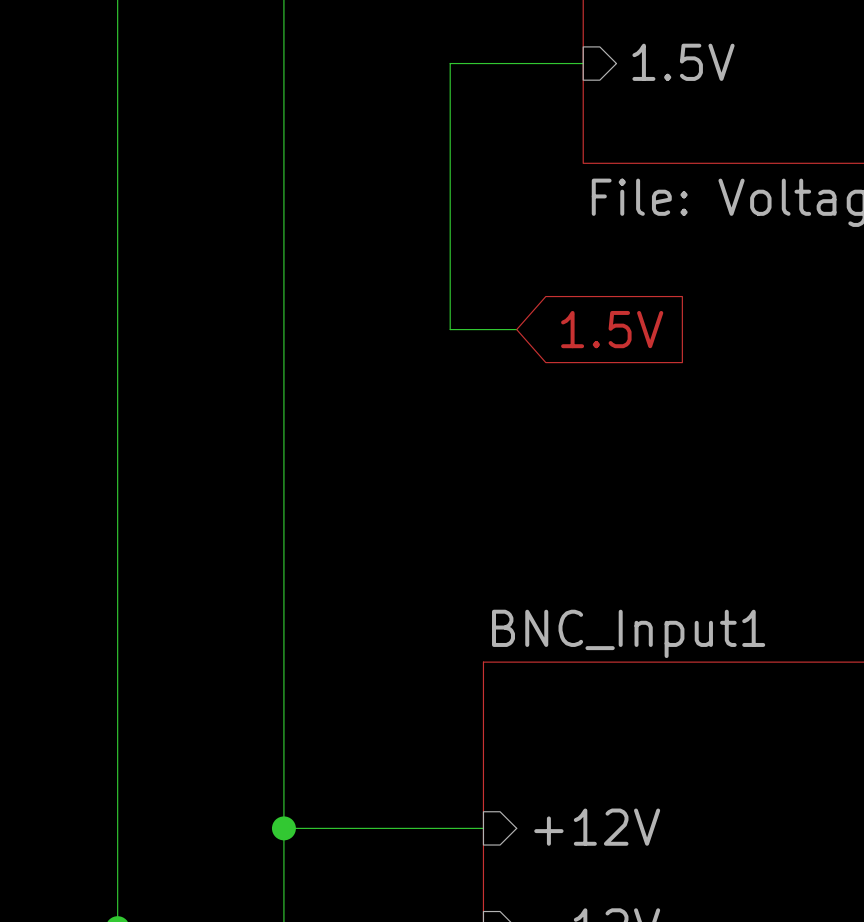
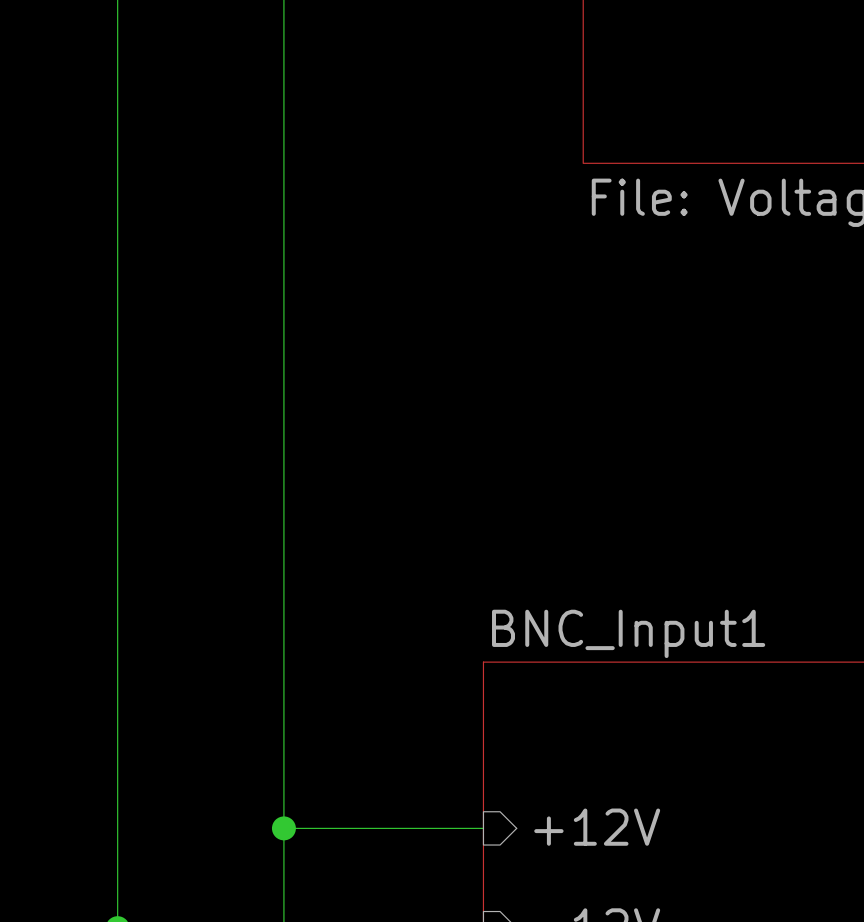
sheet pin: 1.5V (683, 62) -> none
wire: (583, 63) (450, 63) (450, 329) (516, 329) -> none
global label: 1.5V (612, 329) -> none

